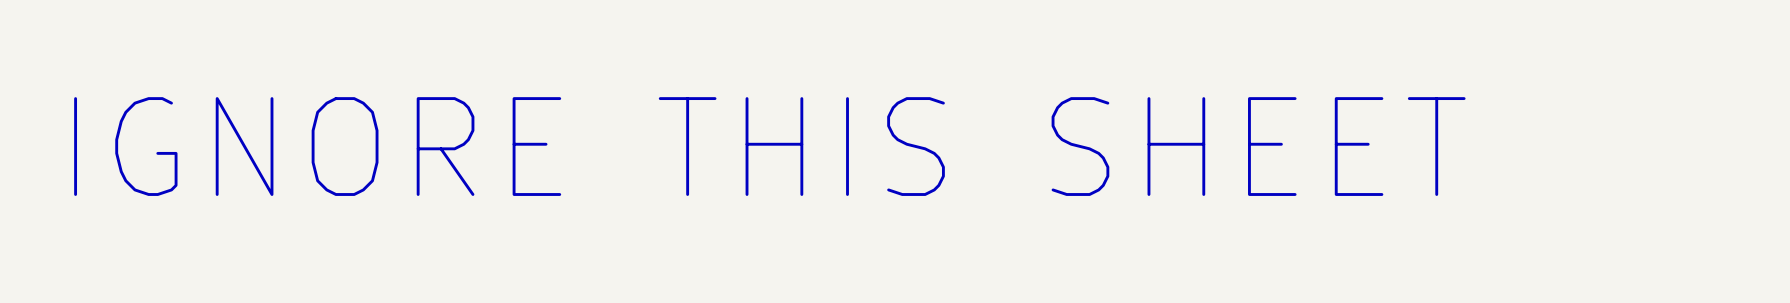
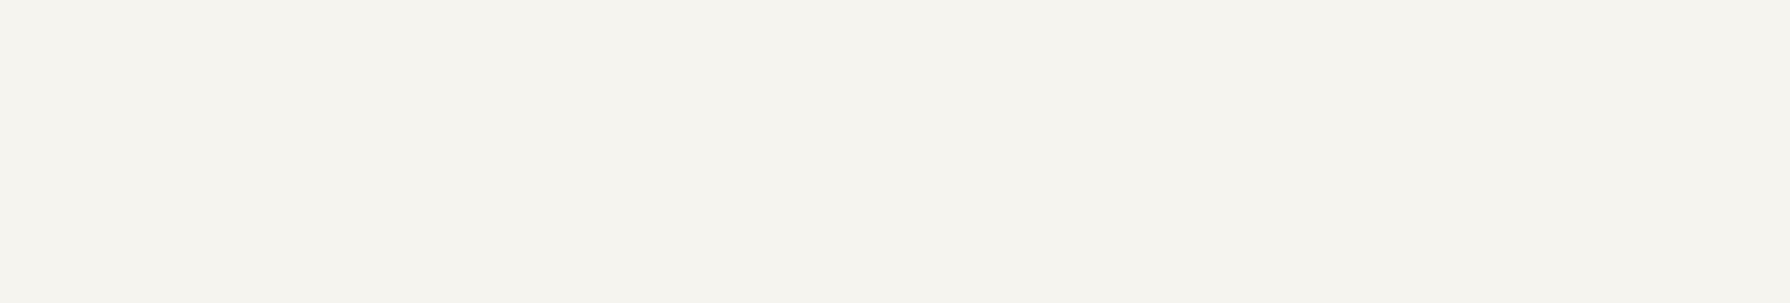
text: IGNORE THIS SHEET (769, 146) -> none

